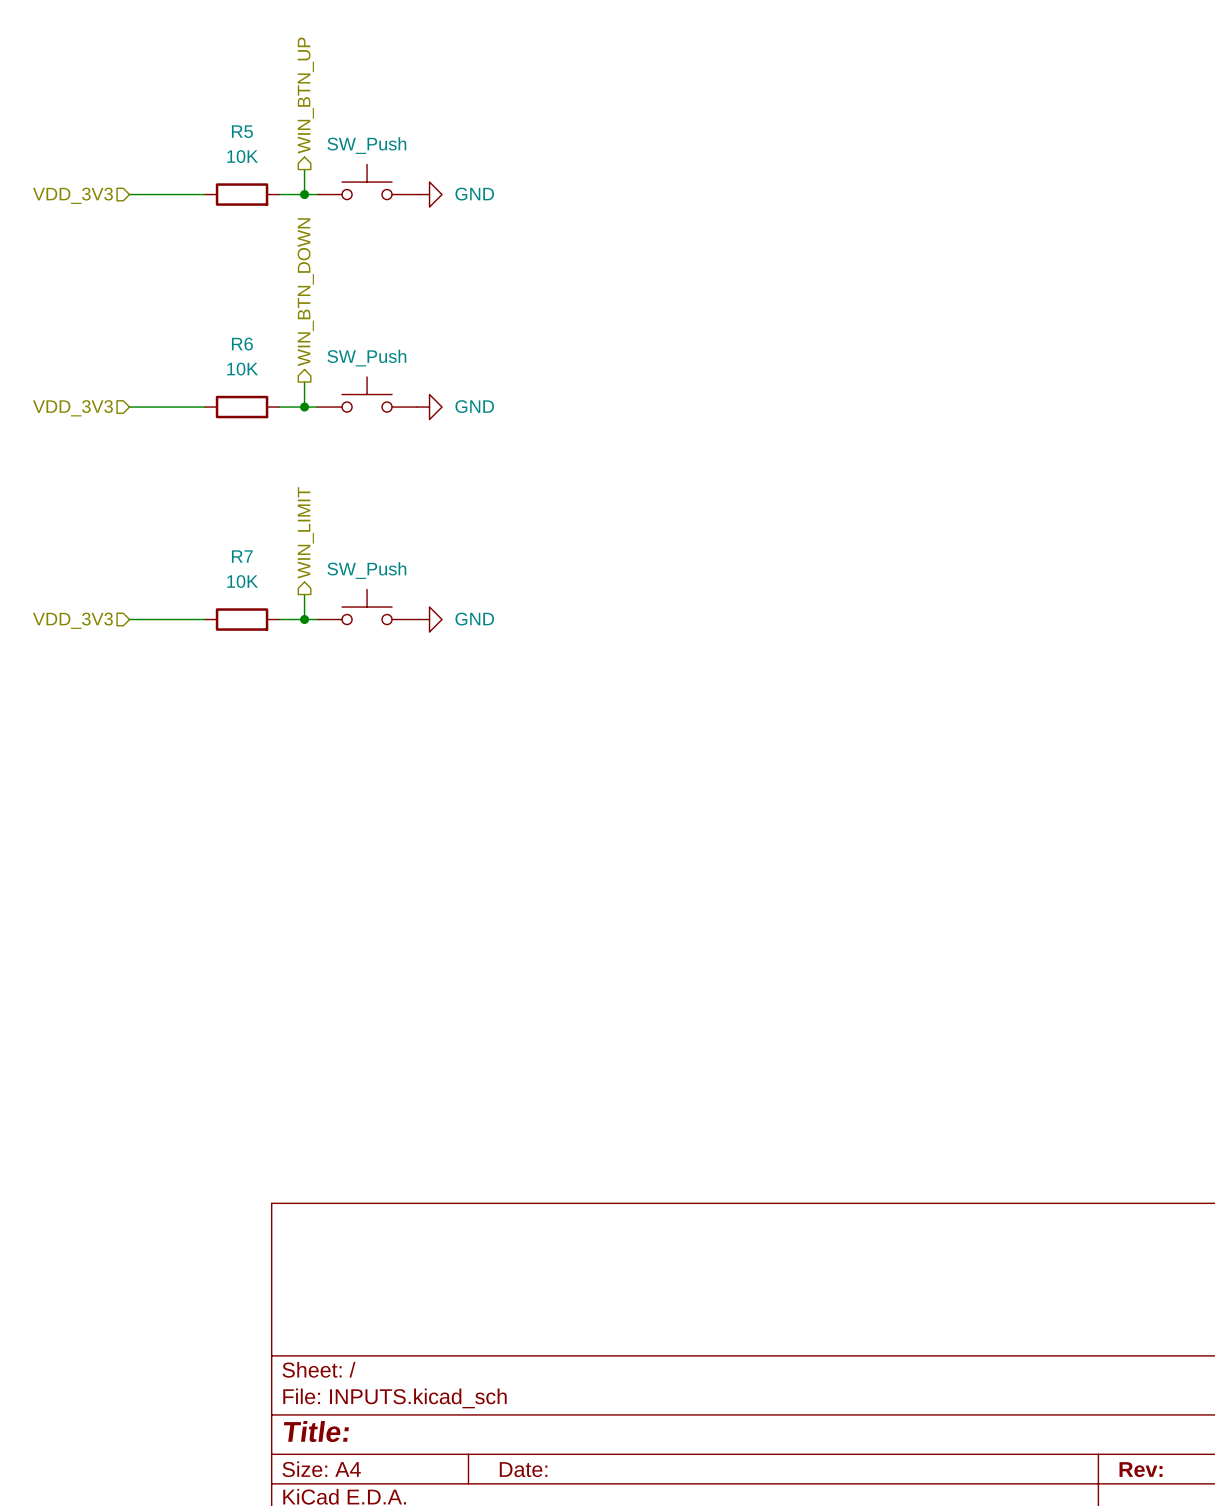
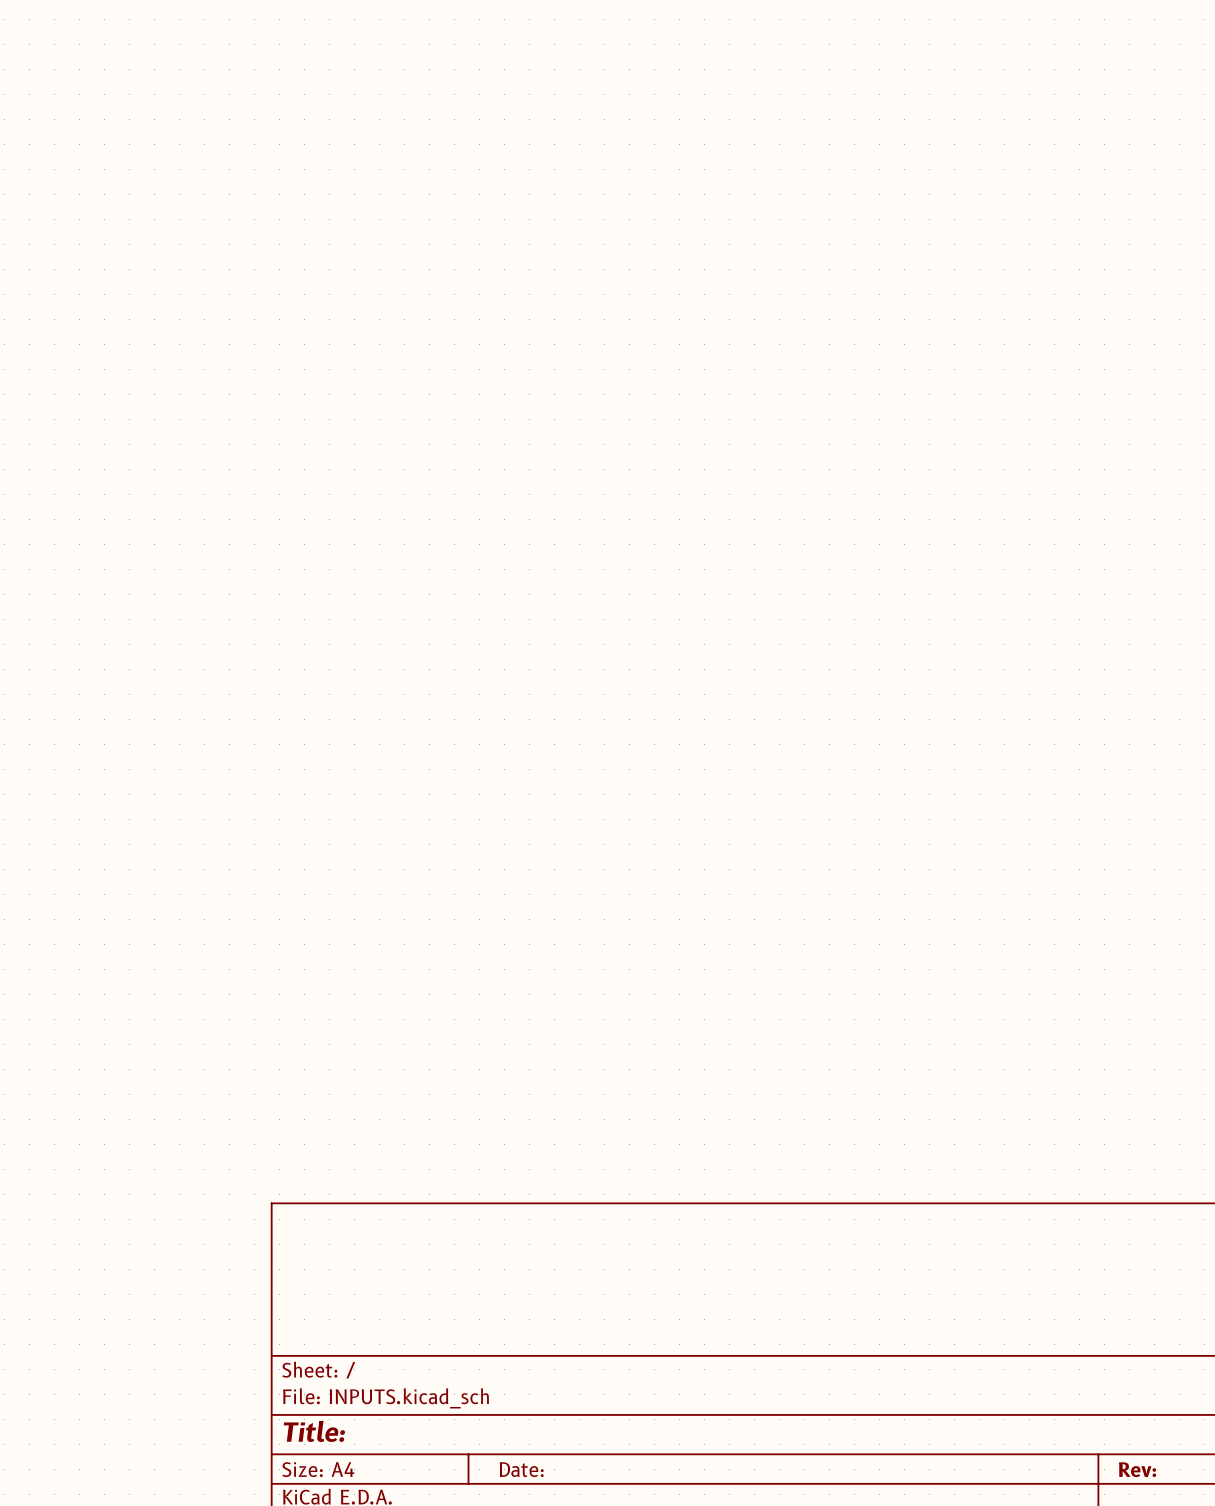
hierarchical label: WIN_BTN_UP (305, 95) -> none
wire: (304, 169) (304, 194) -> none
part: SW_Push (367, 182) -> none
wire: (129, 194) (204, 194) -> none
R5: 10K (242, 194) -> none
wire: (279, 194) (317, 194) -> none
junction: (304, 194) -> none
power symbol: GND (429, 194) -> none
hierarchical label: VDD_3V3 (72, 195) -> none
hierarchical label: WIN_BTN_DOWN (305, 292) -> none
wire: (304, 382) (304, 407) -> none
part: SW_Push (367, 394) -> none
wire: (129, 407) (204, 407) -> none
R6: 10K (242, 407) -> none
wire: (279, 407) (317, 407) -> none
junction: (304, 407) -> none
power symbol: GND (429, 407) -> none
hierarchical label: VDD_3V3 (72, 408) -> none
hierarchical label: WIN_LIMIT (305, 532) -> none
wire: (304, 594) (304, 619) -> none
part: SW_Push (367, 607) -> none
wire: (129, 619) (204, 619) -> none
R7: 10K (242, 619) -> none
wire: (279, 619) (317, 619) -> none
junction: (304, 619) -> none
power symbol: GND (429, 619) -> none
hierarchical label: VDD_3V3 (72, 620) -> none

